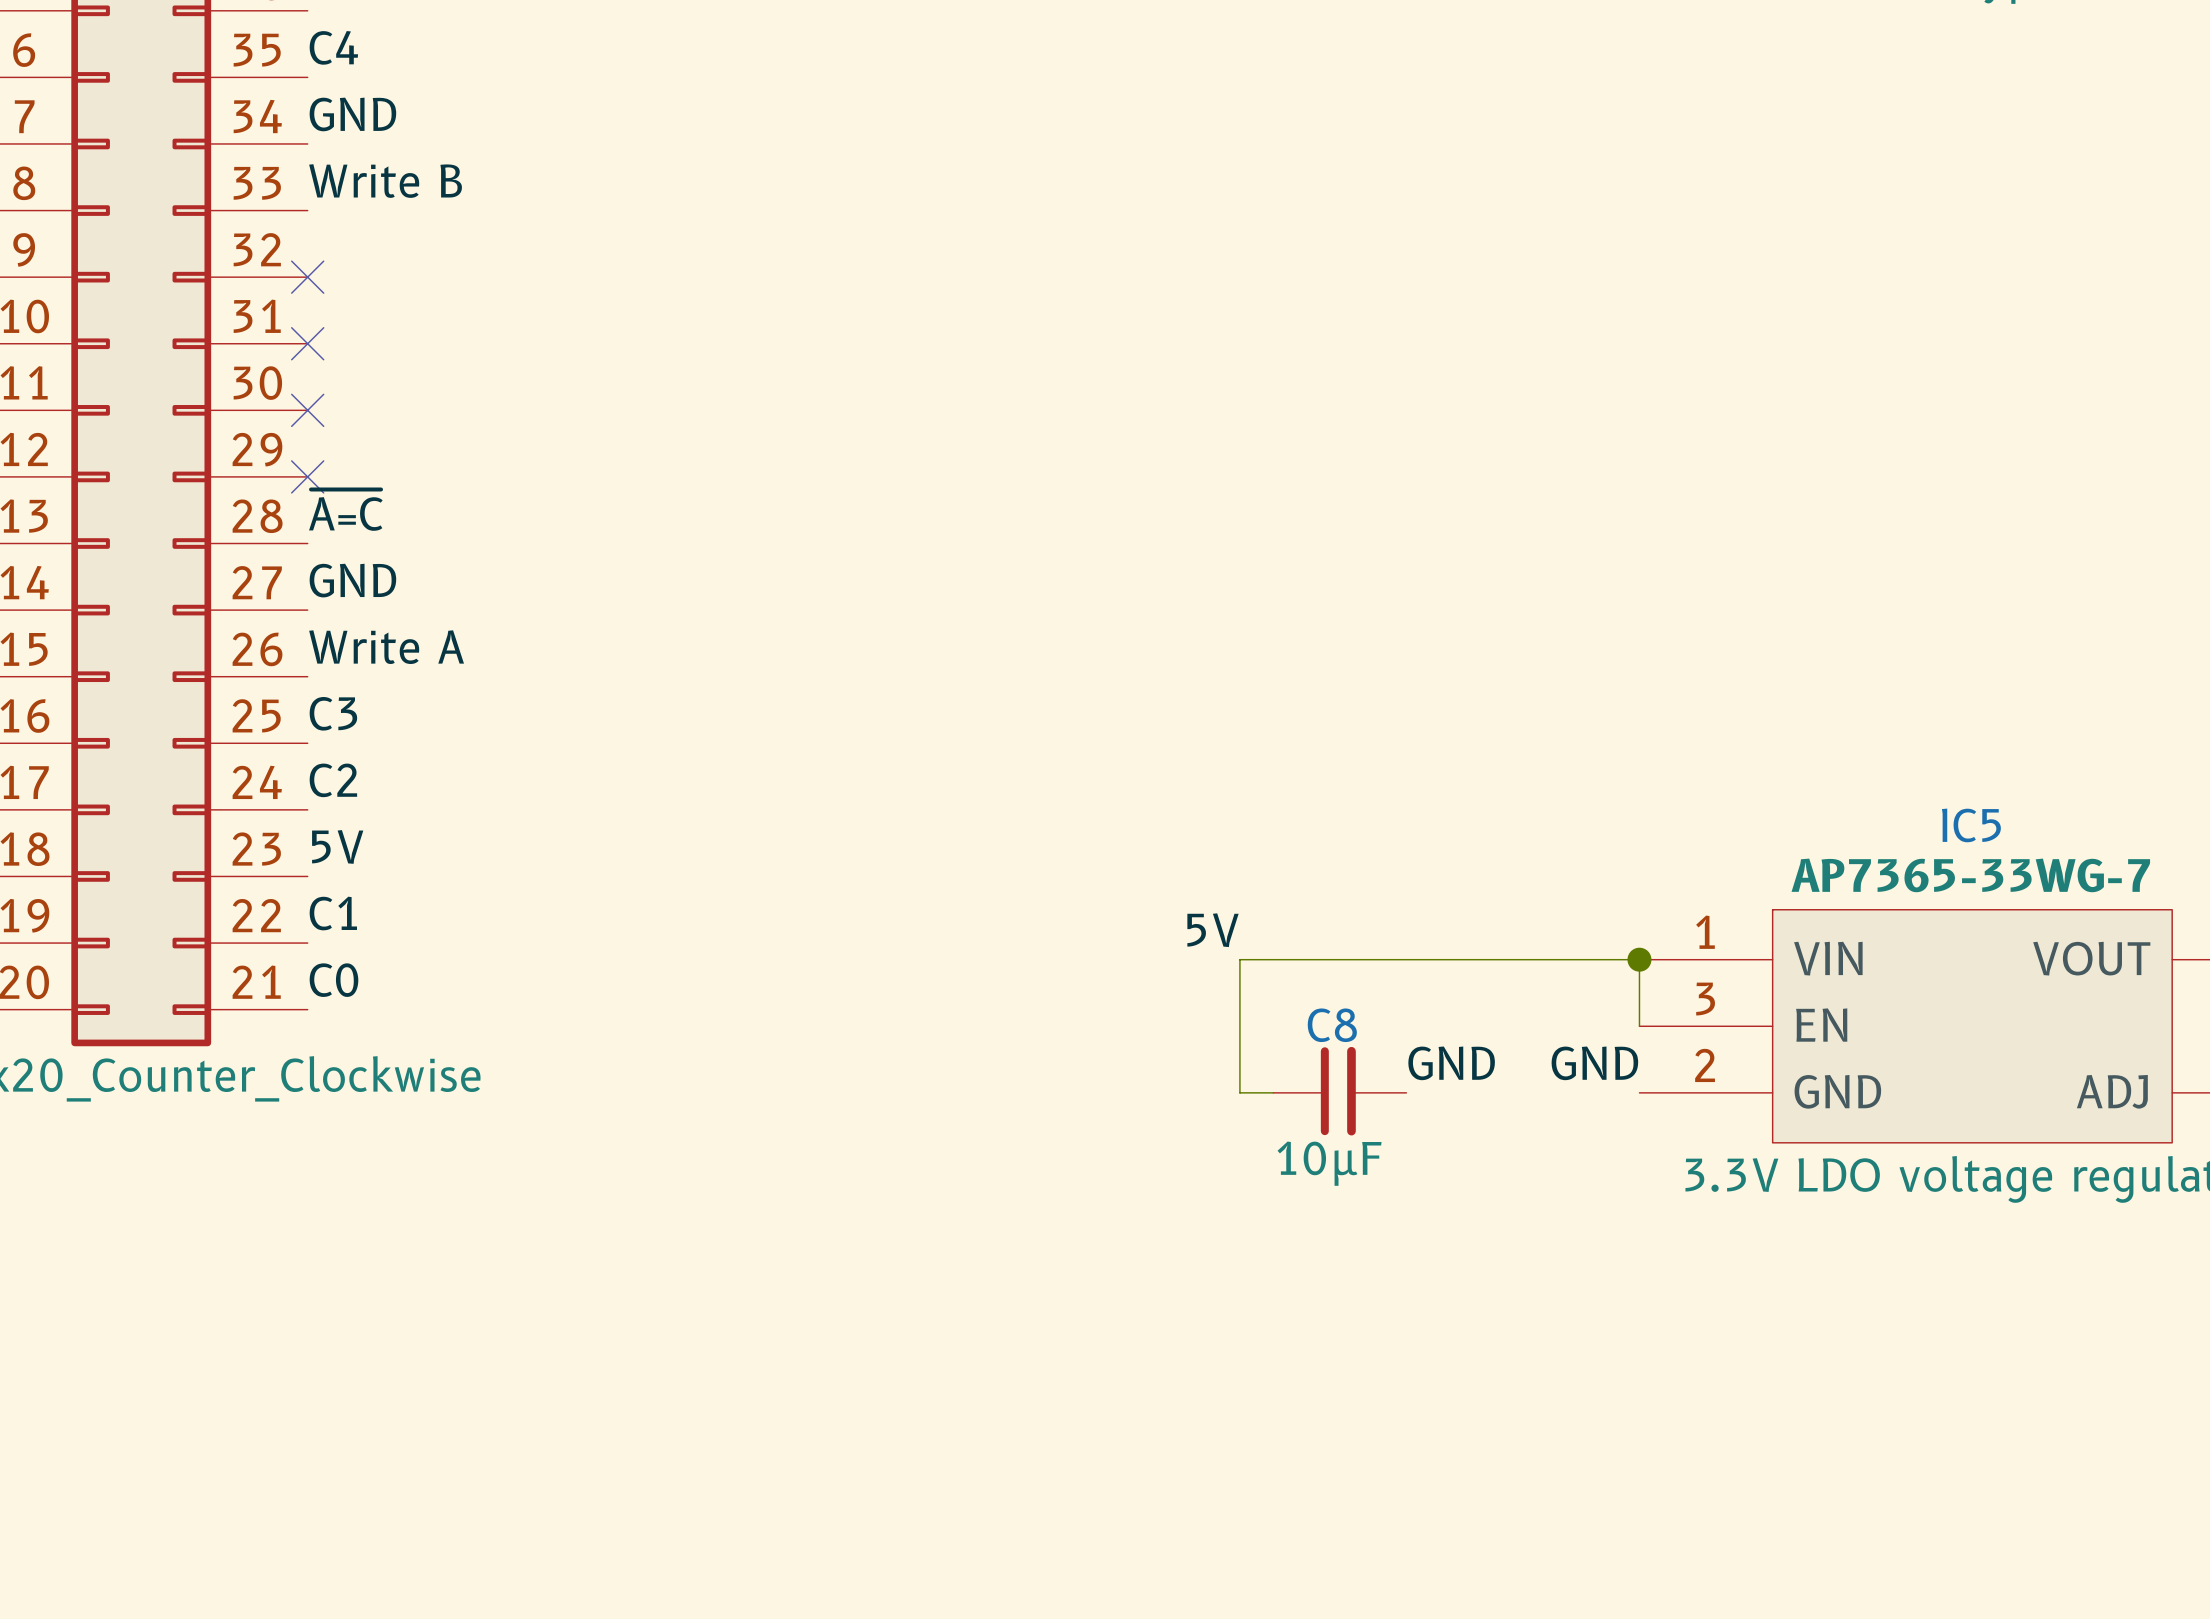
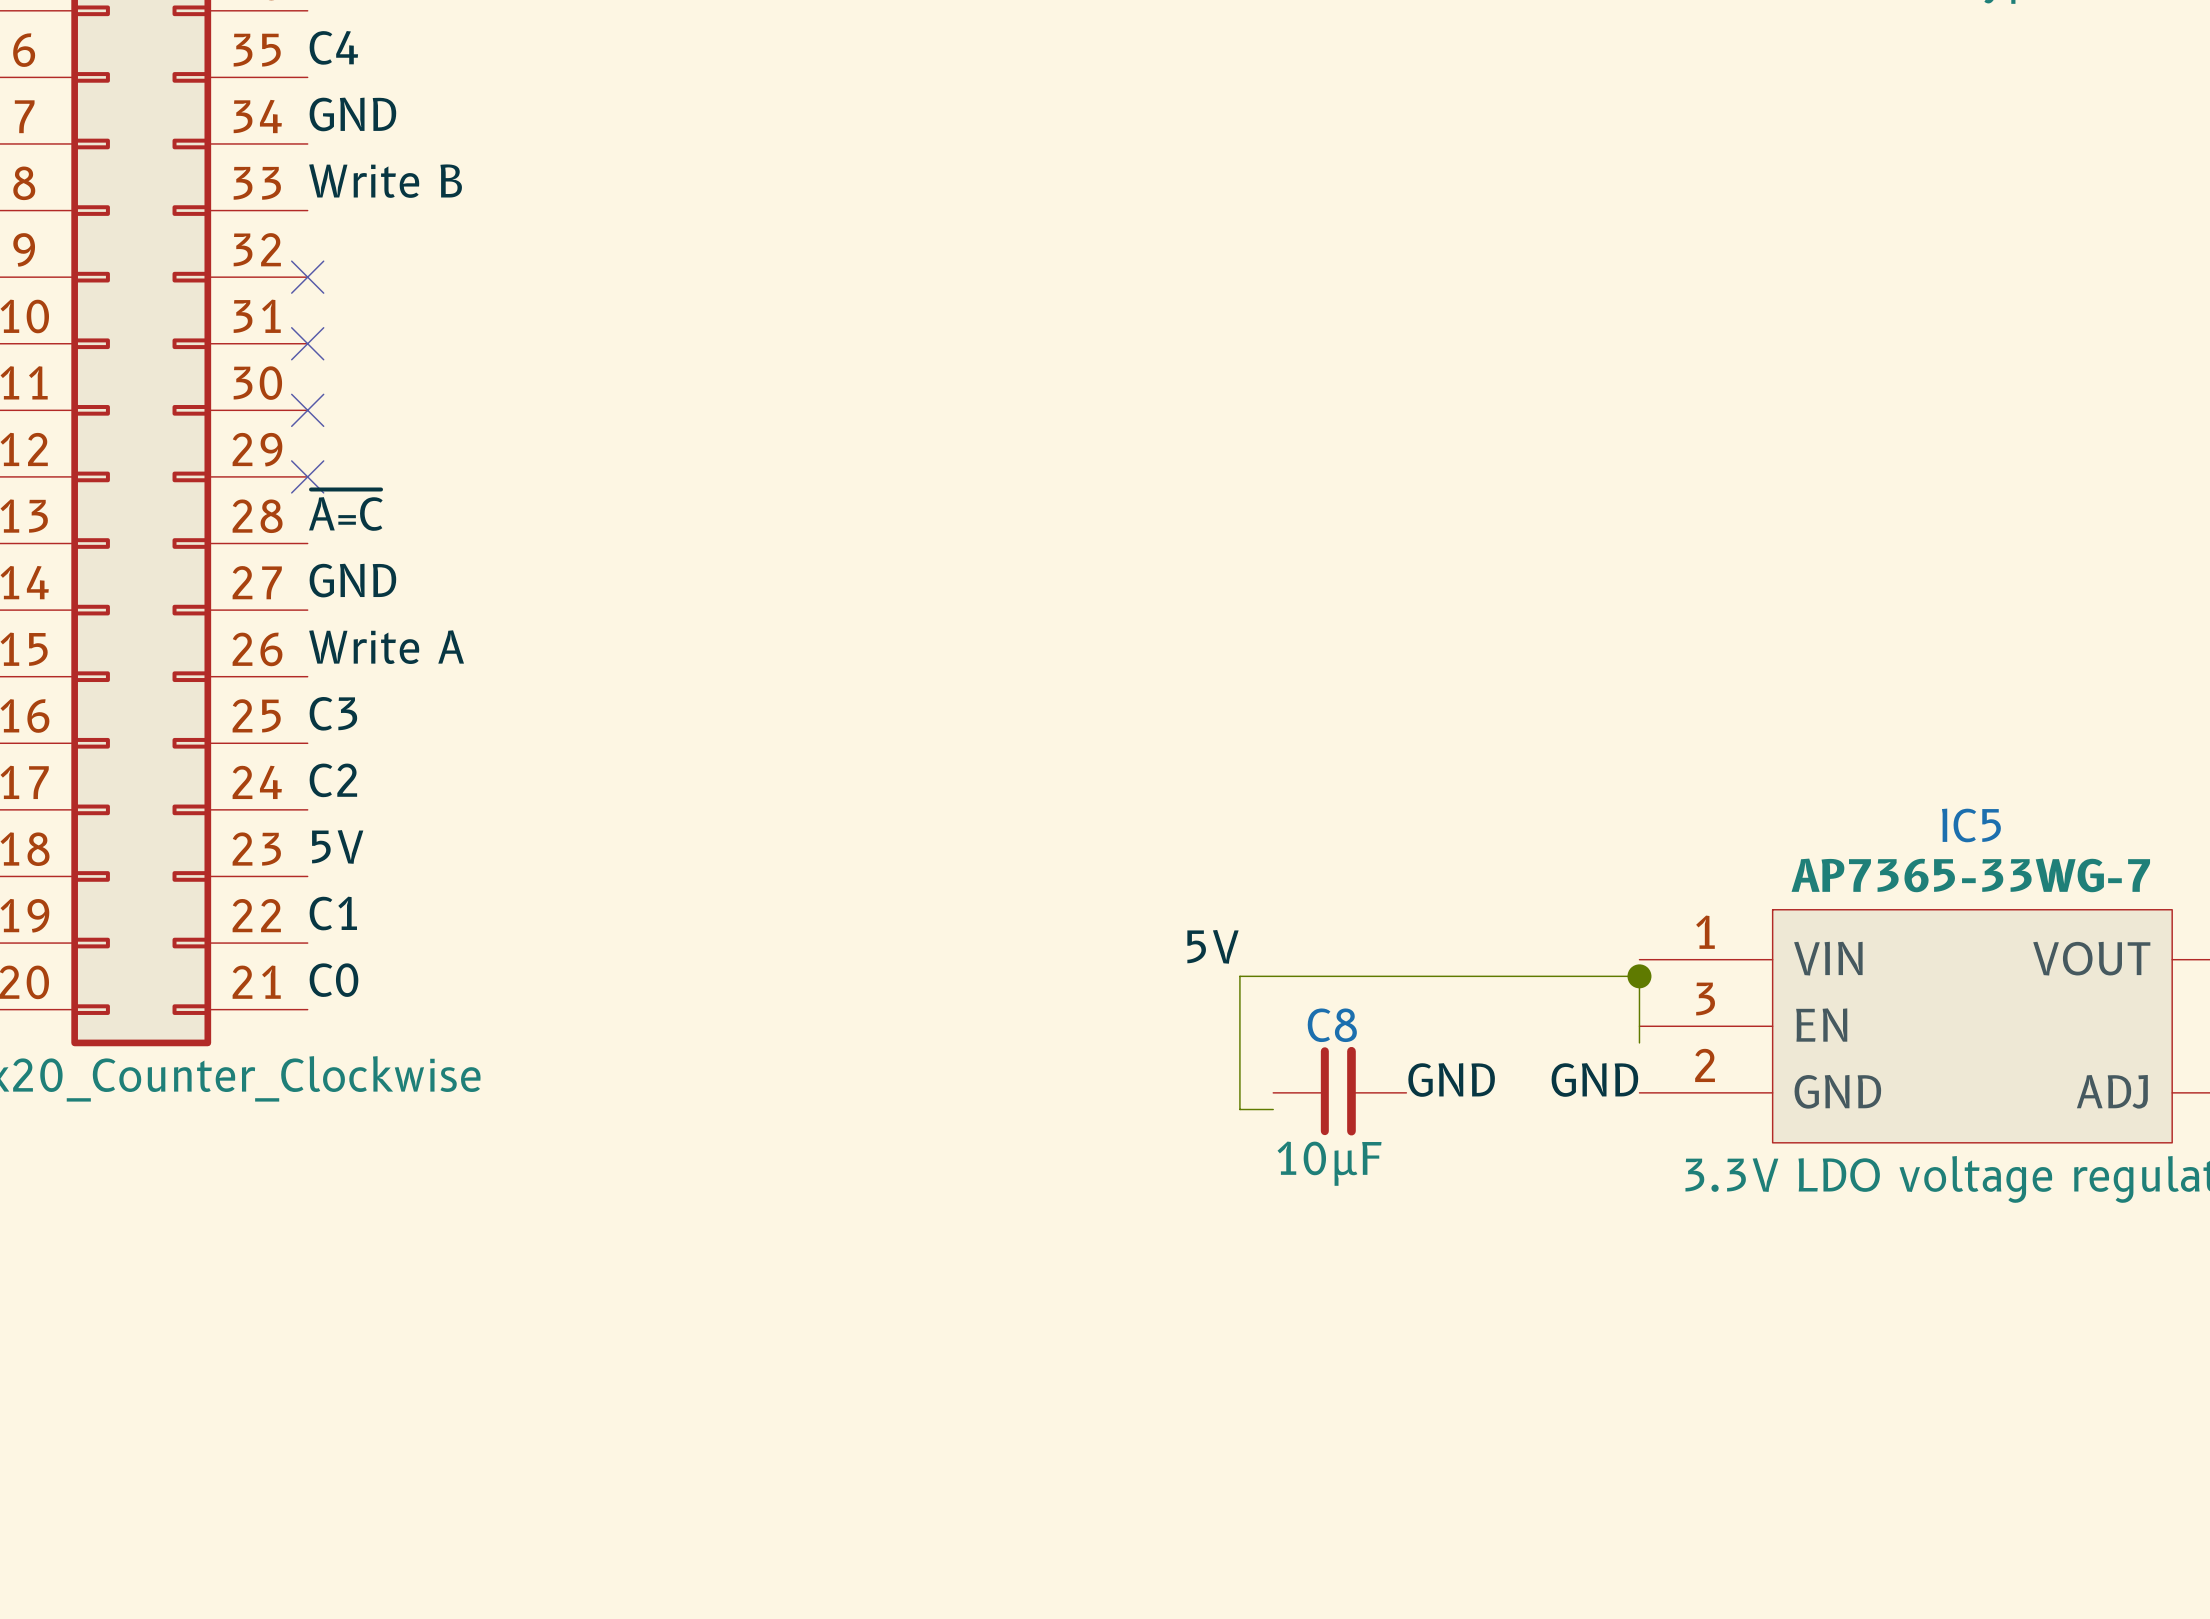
label position: 5V (1212, 930) -> 5V (1212, 946)
junction position: (1639, 959) -> (1639, 976)
wire: (1239, 976) (1239, 959) (1639, 959) (1639, 976) -> (1239, 976) (1639, 976)
wire: none -> (1639, 1026) (1639, 1042)
label position: GND (1451, 1063) -> GND (1451, 1079)
label position: GND (1594, 1063) -> GND (1594, 1079)
wire: (1239, 1092) (1273, 1092) -> (1239, 1092) (1239, 1109) (1273, 1109)

